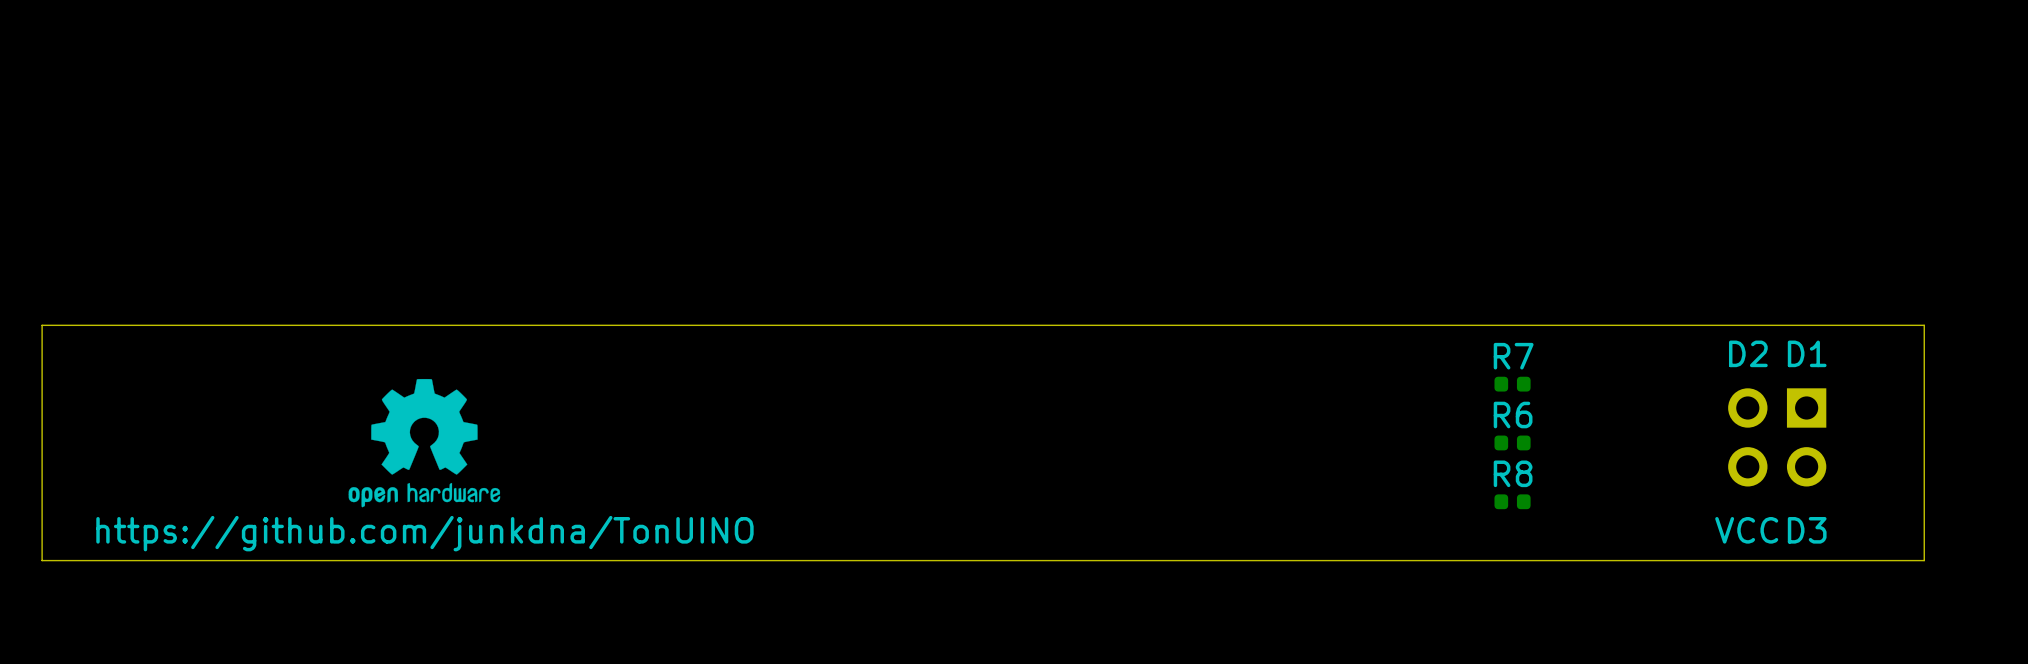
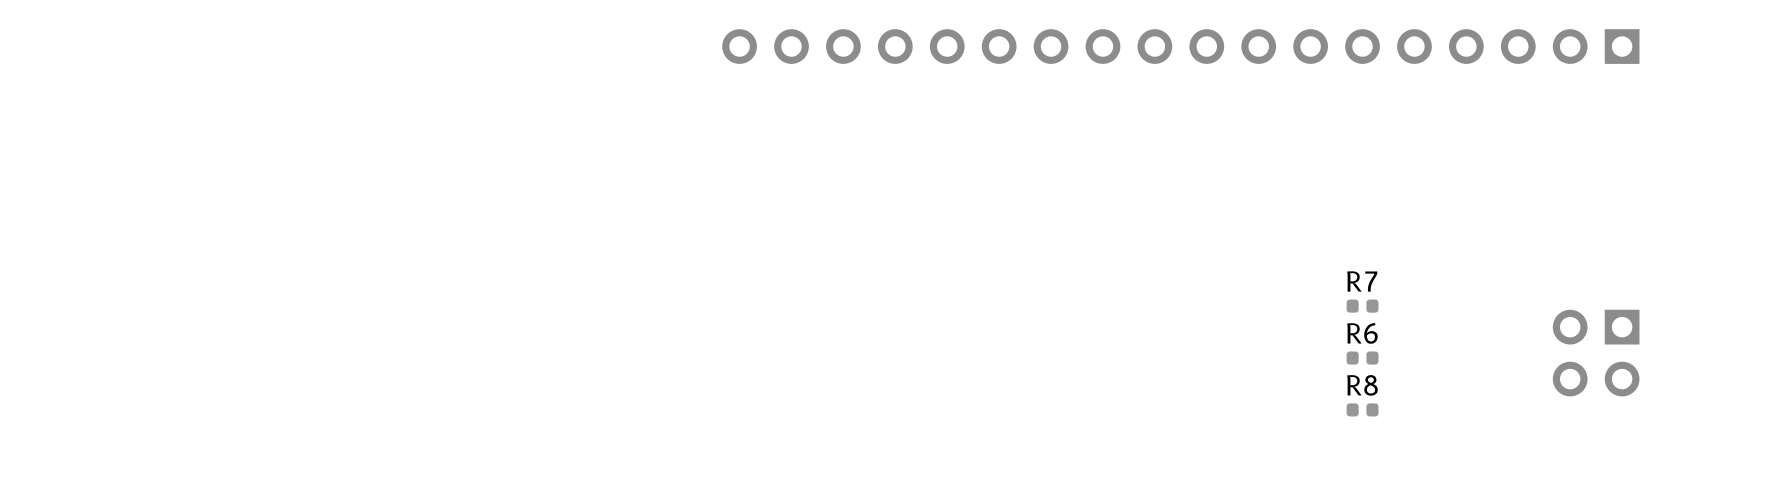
part: none -> (1180, 46)
board edge: (1924, 325) (42, 325) (42, 560) (1924, 560) (1924, 325) -> none
text: D2 (1748, 353) -> none
text: D1 (1807, 353) -> none
drawing: [348, 378, 501, 508] -> none
text: VCC (1746, 530) -> none
text: D3 (1807, 530) -> none
text: https://github.com/junkdna/TonUINO (424, 533) -> none

